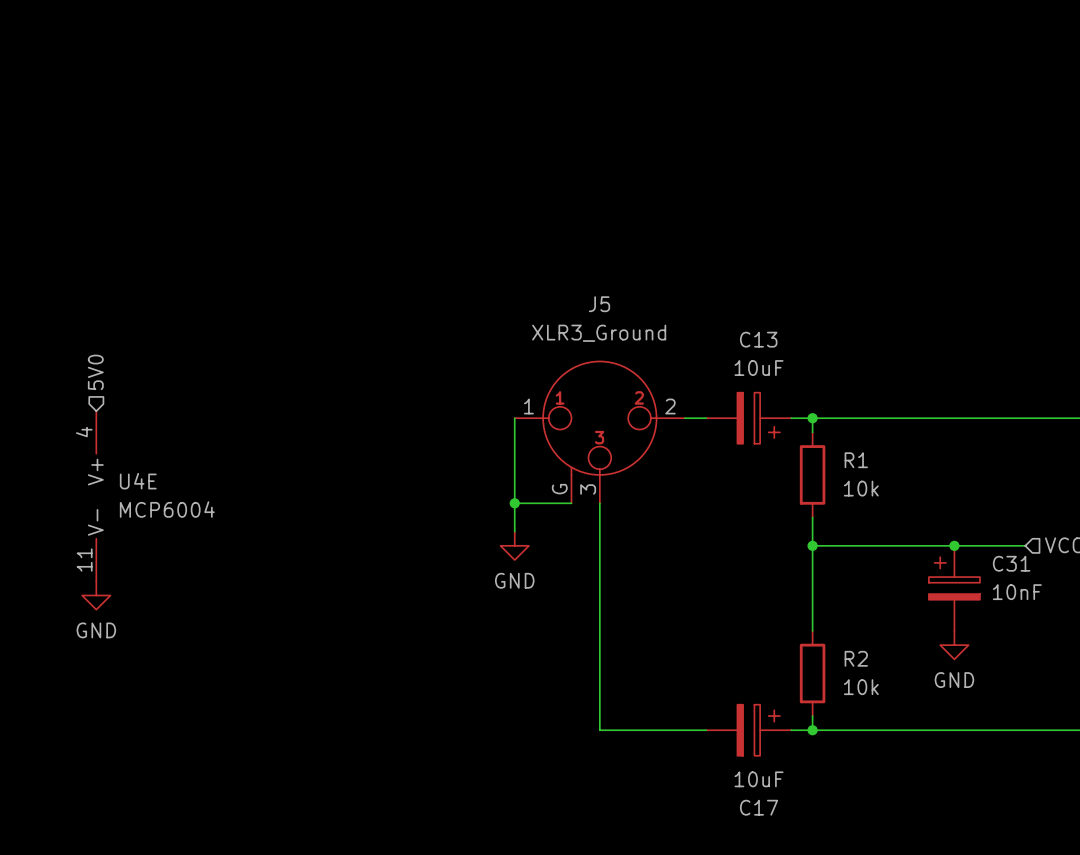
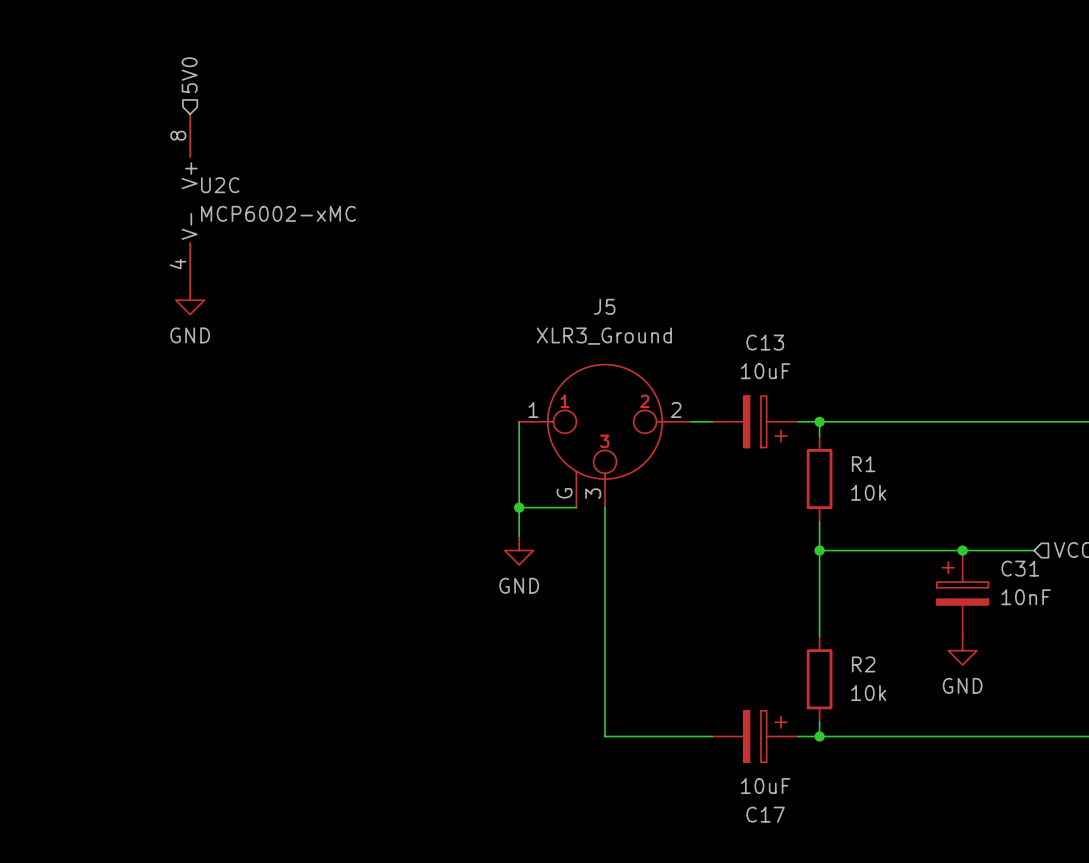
hierarchical label: none -> 5V0 (189, 75)
U2C: none -> MCP6002-xMC (190, 200)
power symbol: none -> GND (190, 300)
hierarchical label: 5V0 (95, 372) -> none
U4E: MCP6004 (96, 496) -> none
power symbol: GND (96, 595) -> none

